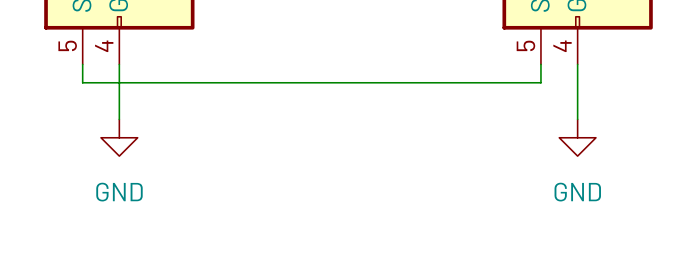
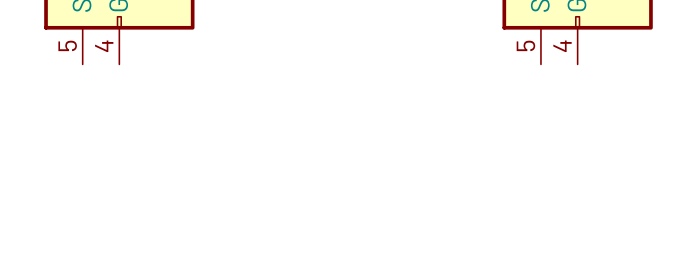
wire: (82, 64) (82, 82) (540, 82) (540, 64) -> none
wire: (119, 64) (119, 119) -> none
wire: (577, 64) (577, 119) -> none
power symbol: GND (119, 137) -> none
power symbol: GND (577, 137) -> none

